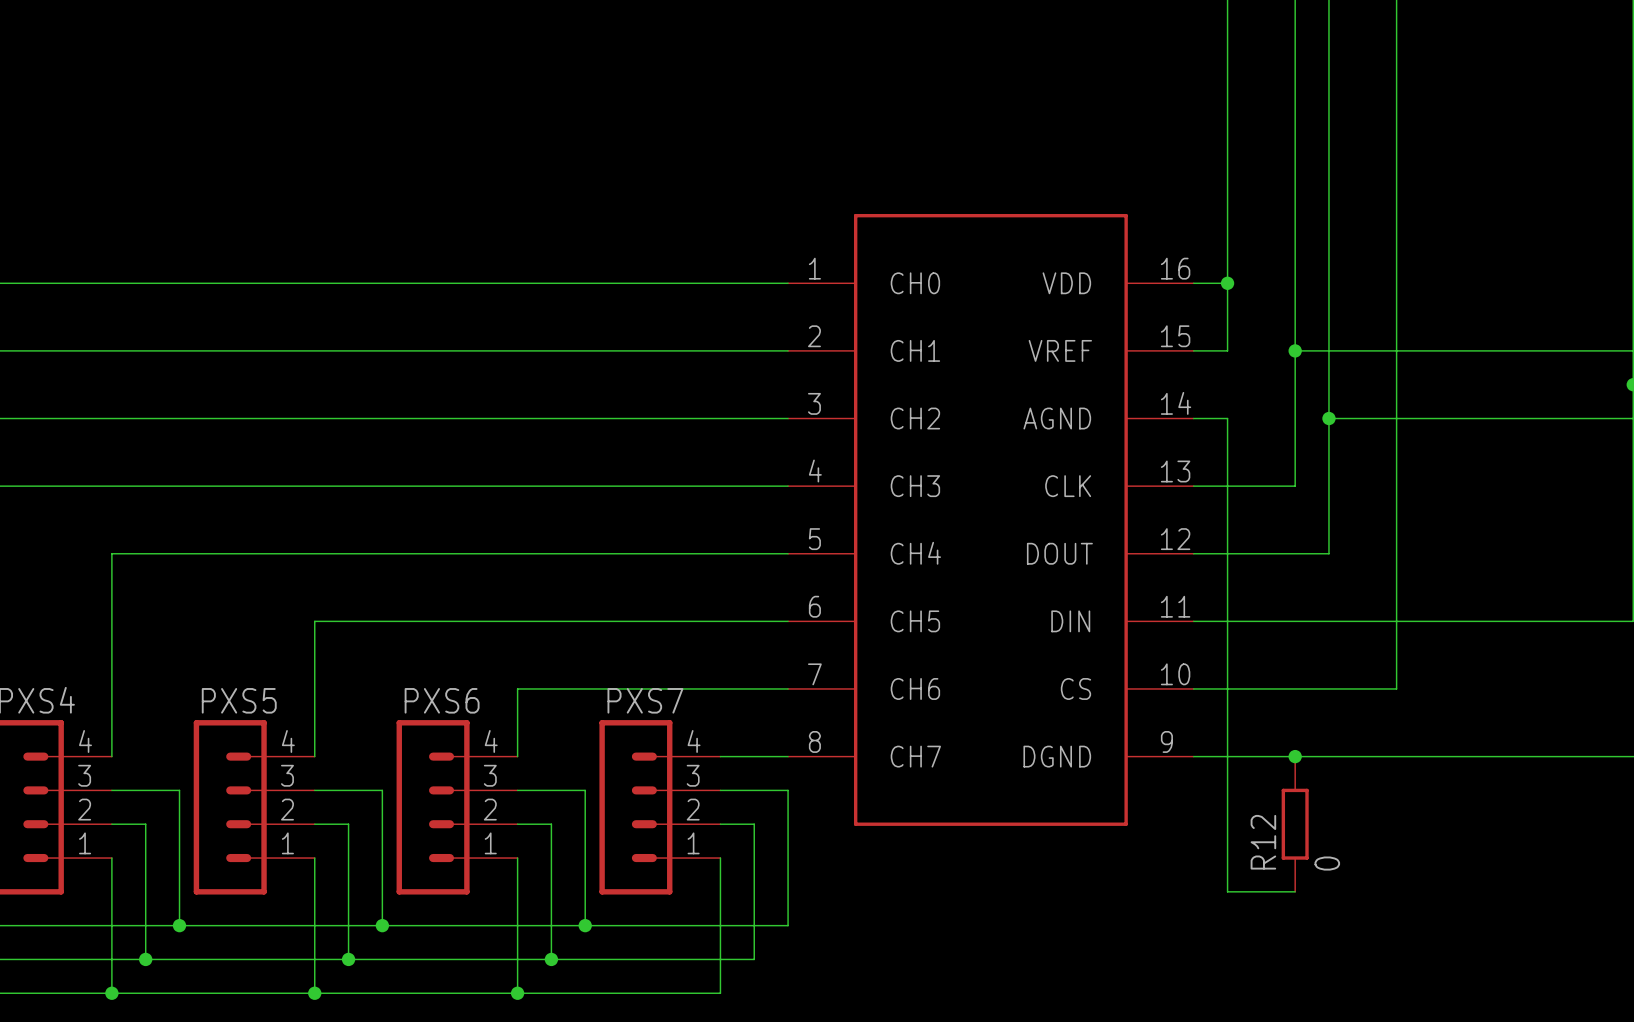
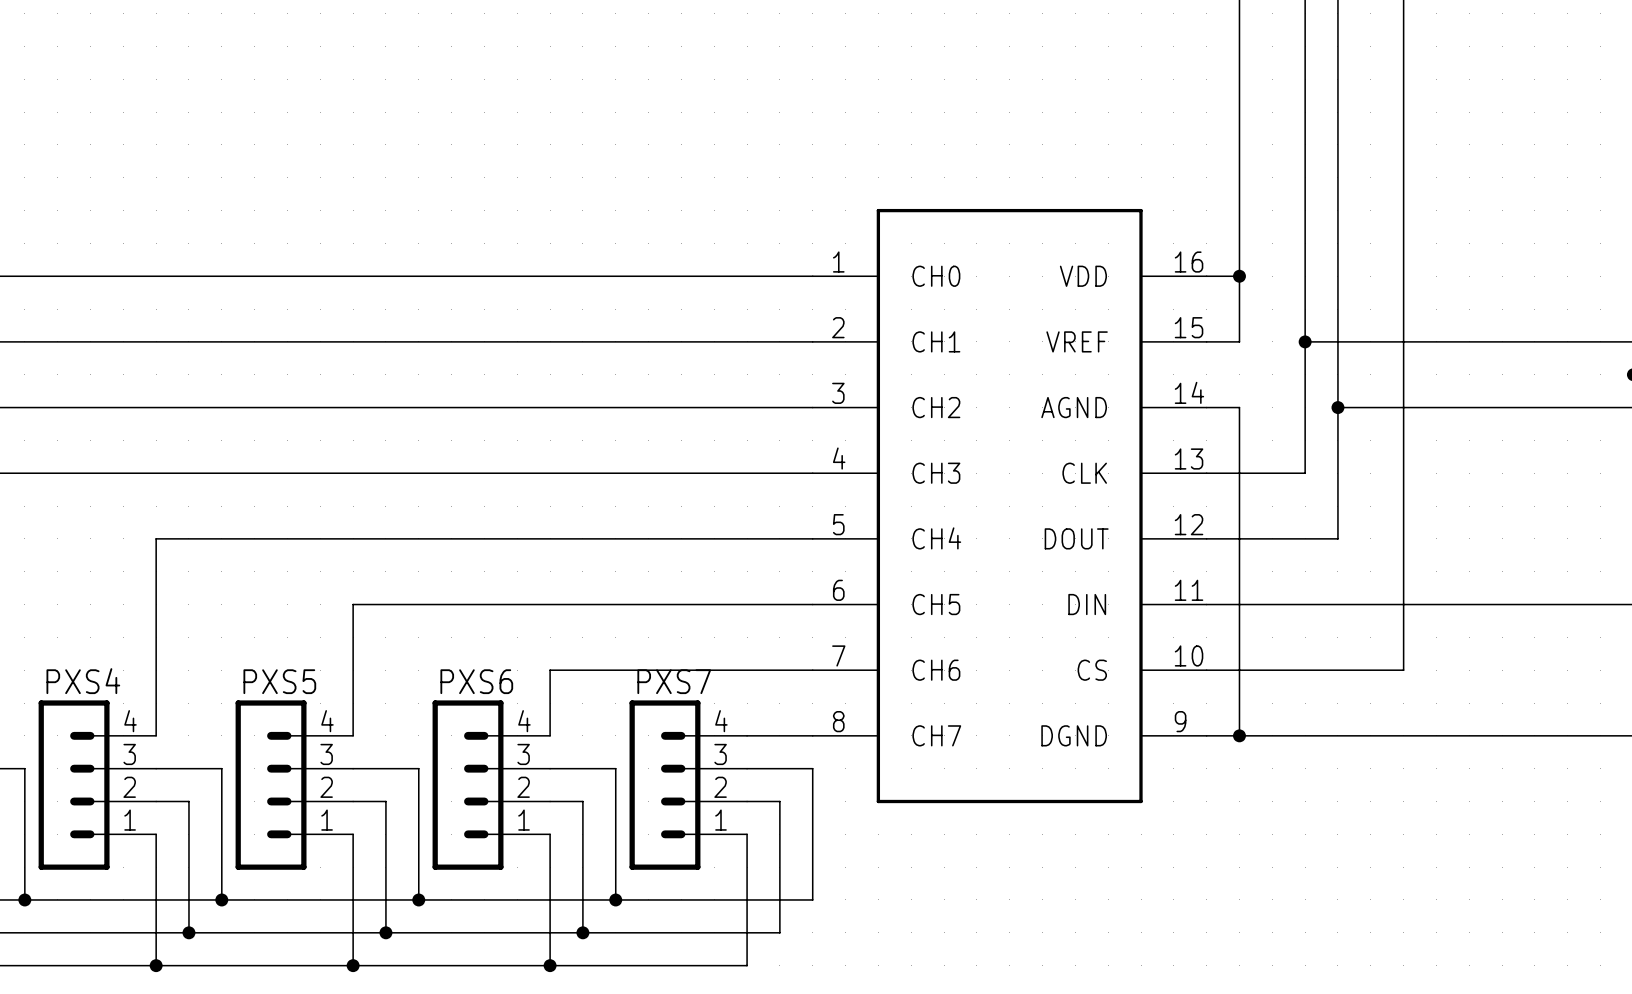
wire: (1227, 756) (1227, 891) (1295, 891) -> none
junction position: (1295, 756) -> (1239, 735)
R12: 0 (1295, 824) -> none

